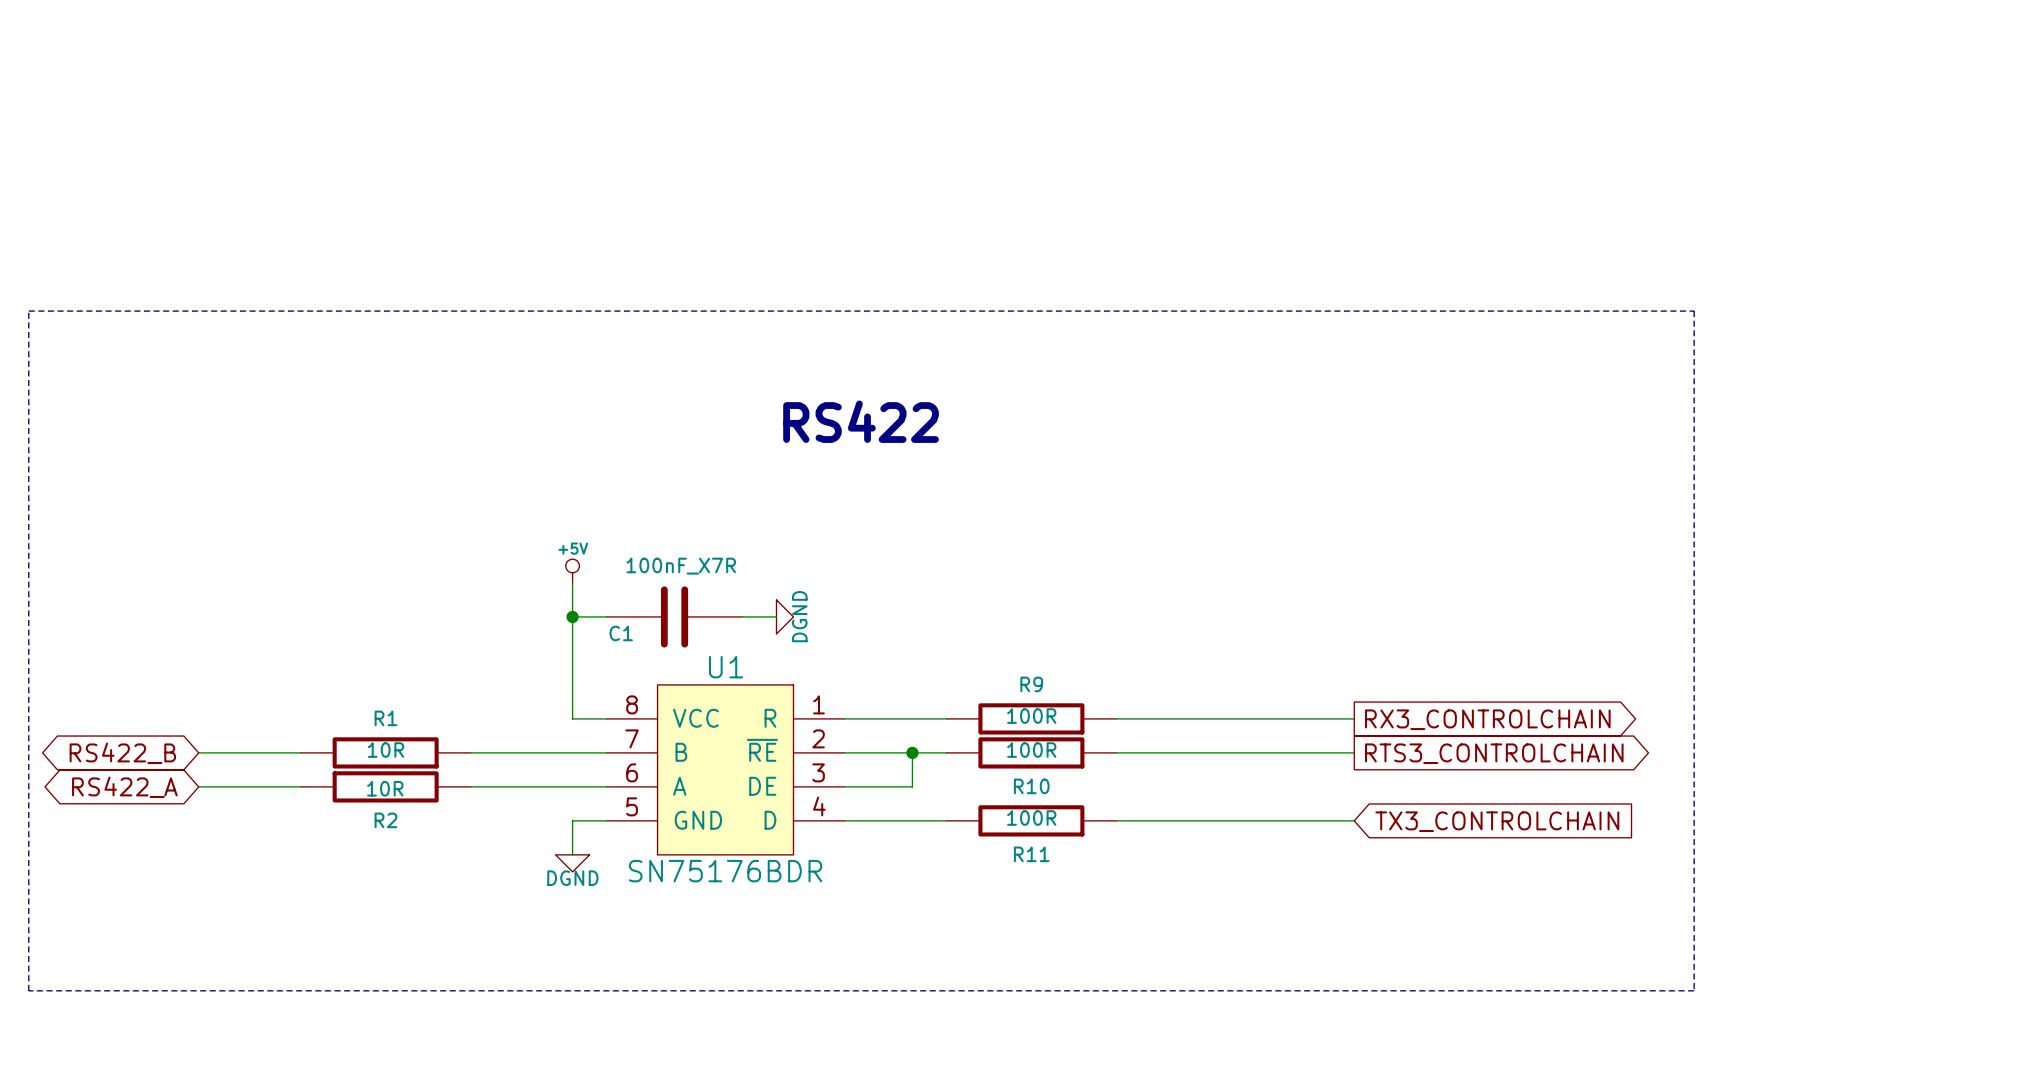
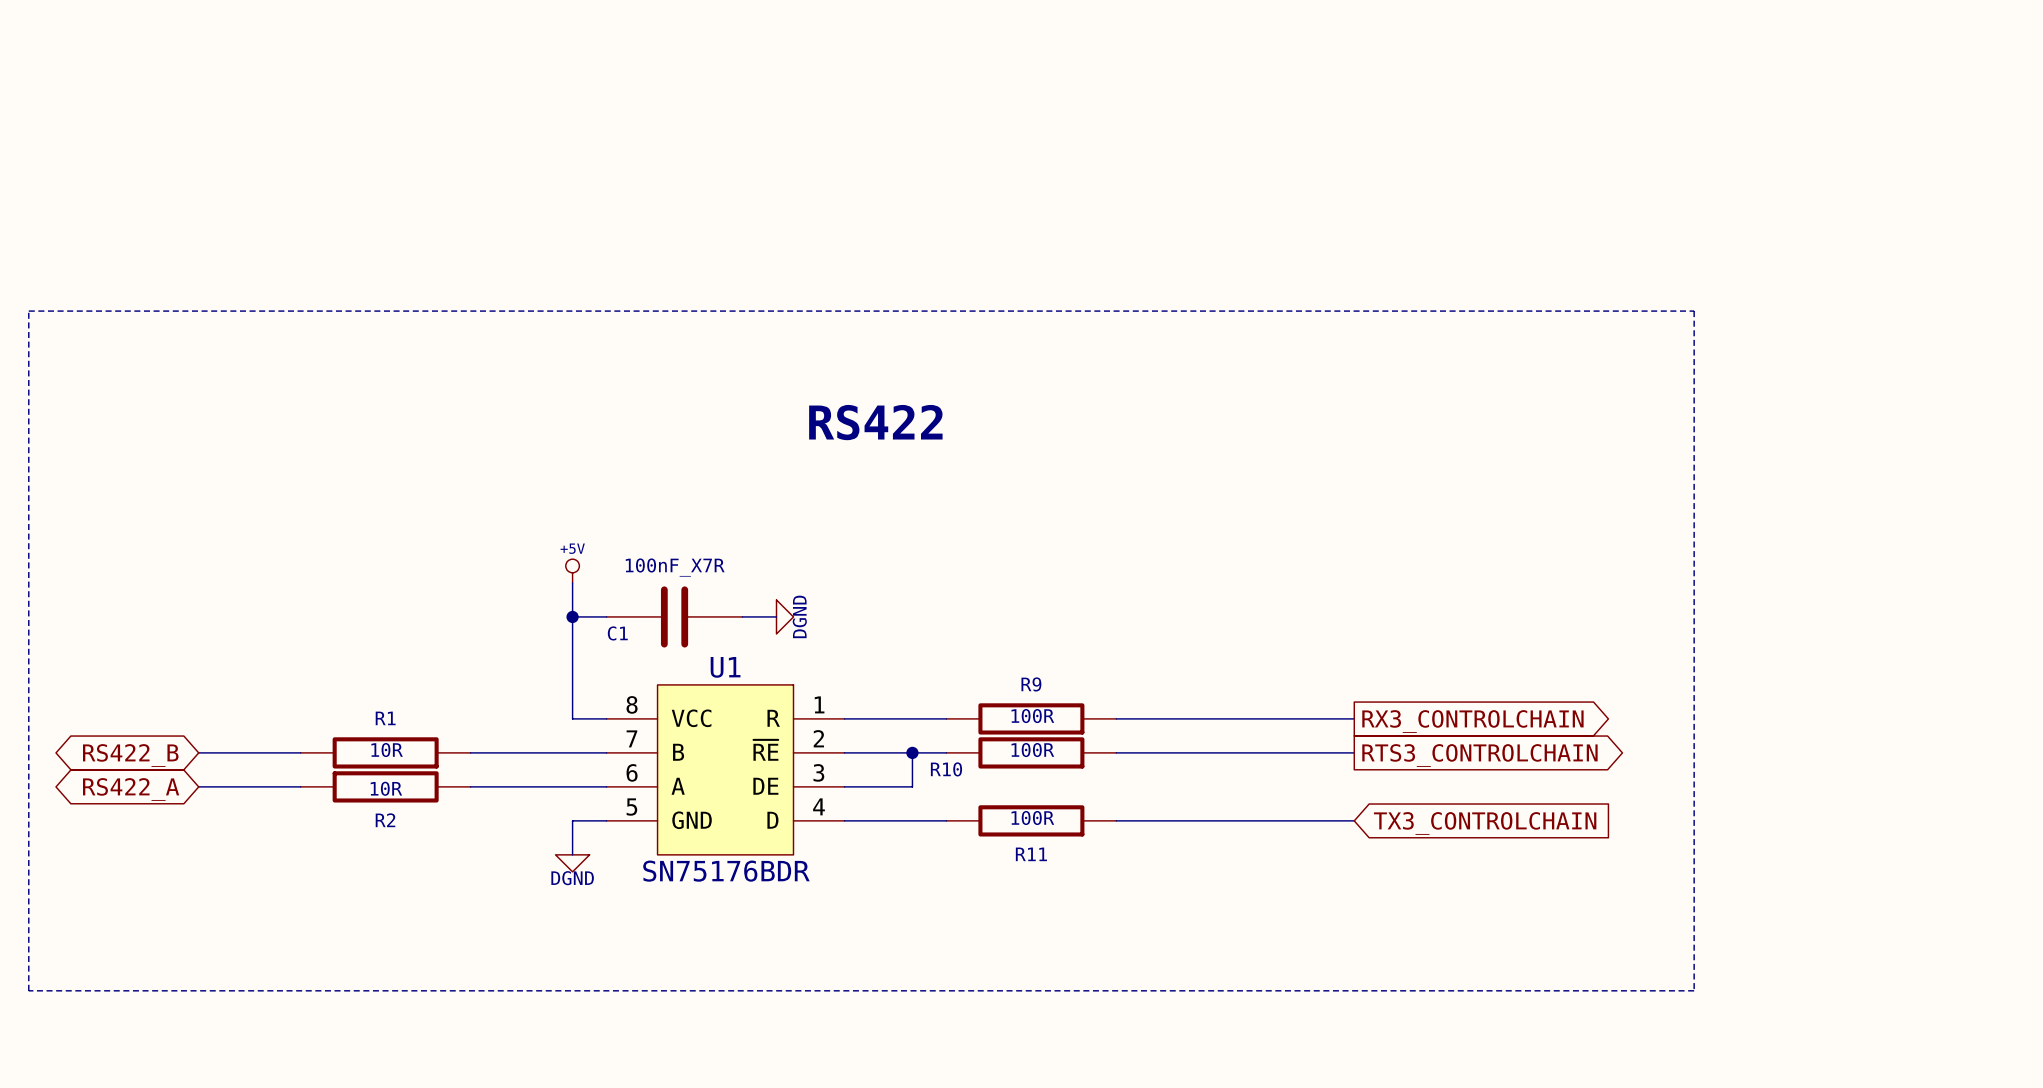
R10 name position: R10 (1031, 786) -> R10 (946, 769)

